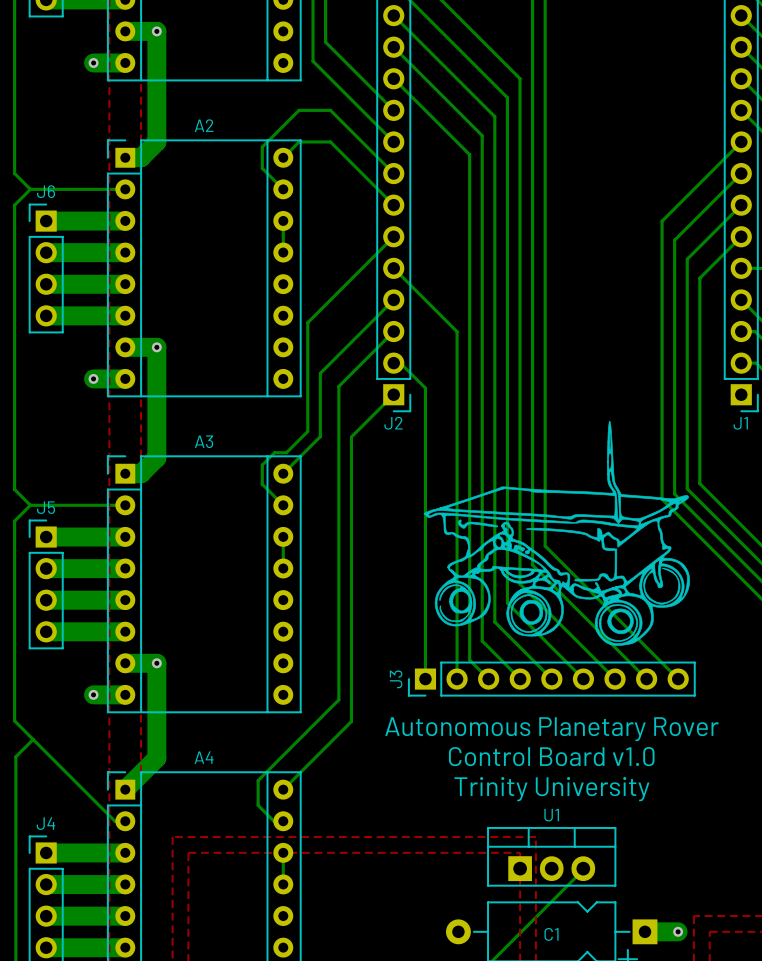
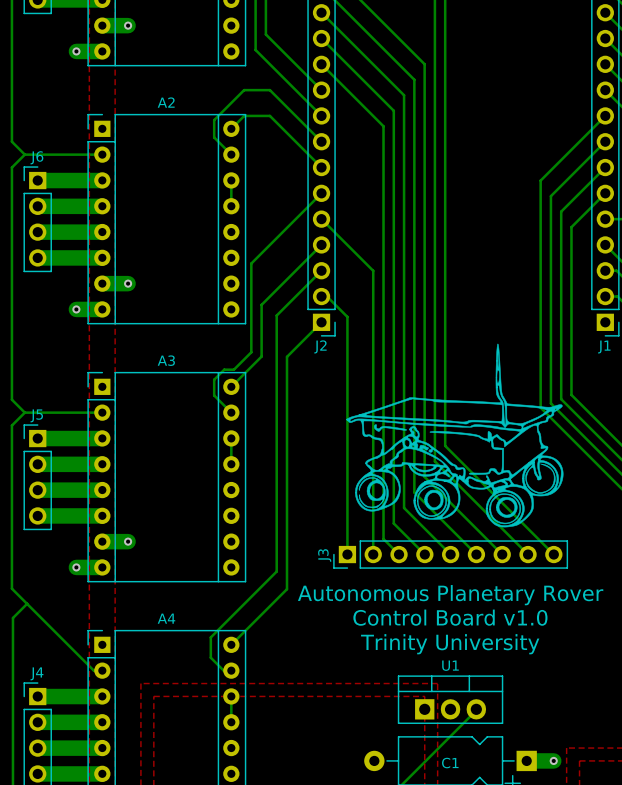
bottom track: (156, 31) (156, 141) (140, 157) (125, 157) -> none
bottom track: (156, 347) (156, 457) (140, 473) (125, 473) -> none
bottom track: (156, 663) (156, 758) (125, 789) -> none

